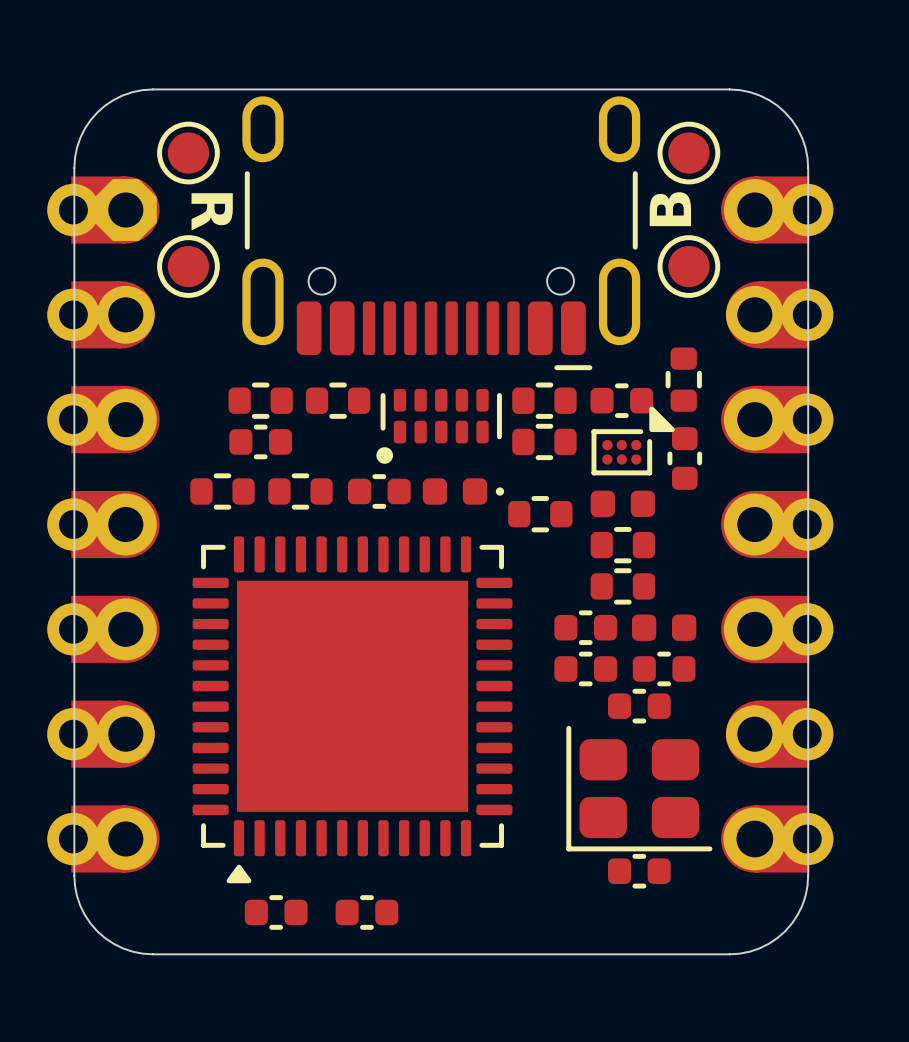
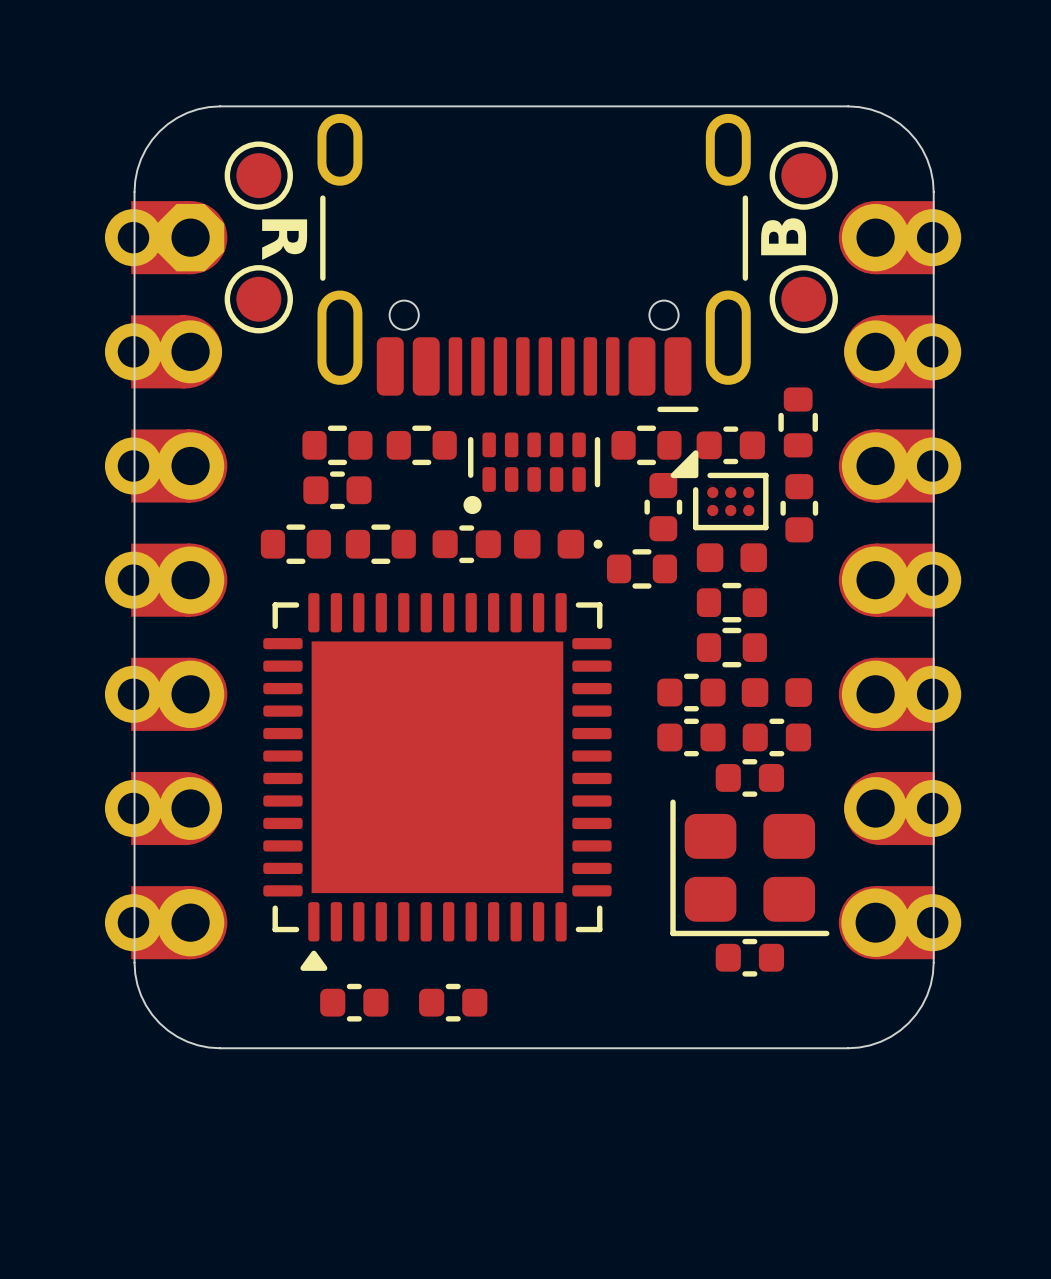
part footprint: [591, 406, 675, 476] -> [670, 450, 769, 531]
part footprint: [512, 423, 577, 461] -> [644, 472, 683, 542]

